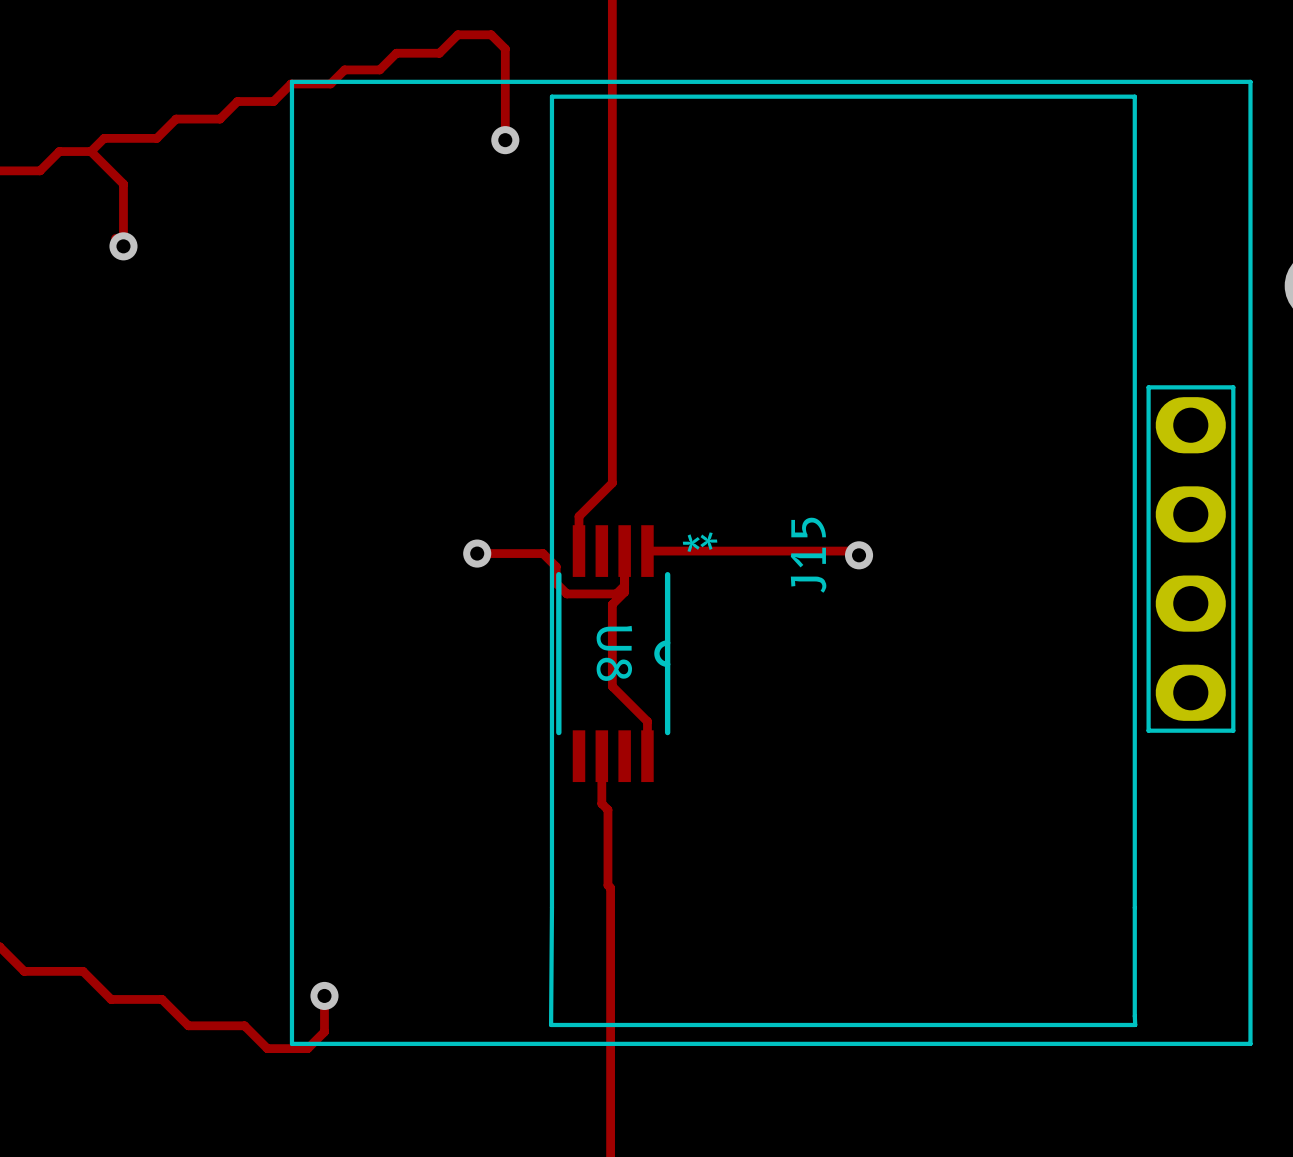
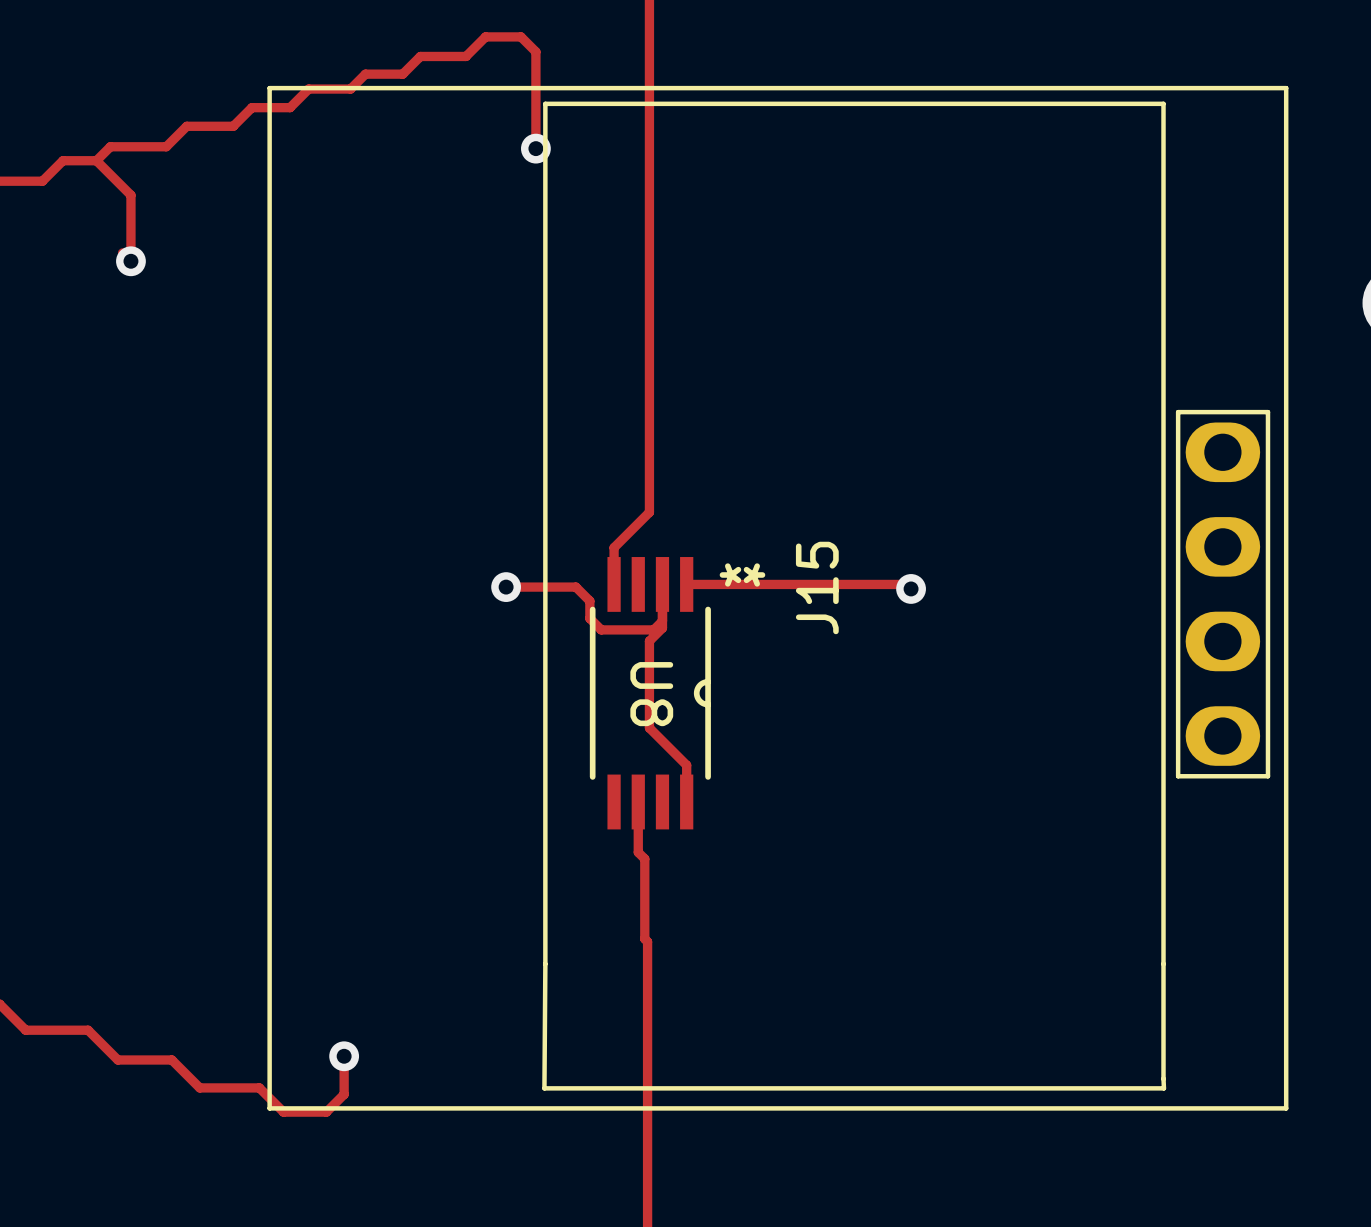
J15 position: (771, 562) -> (777, 598)

